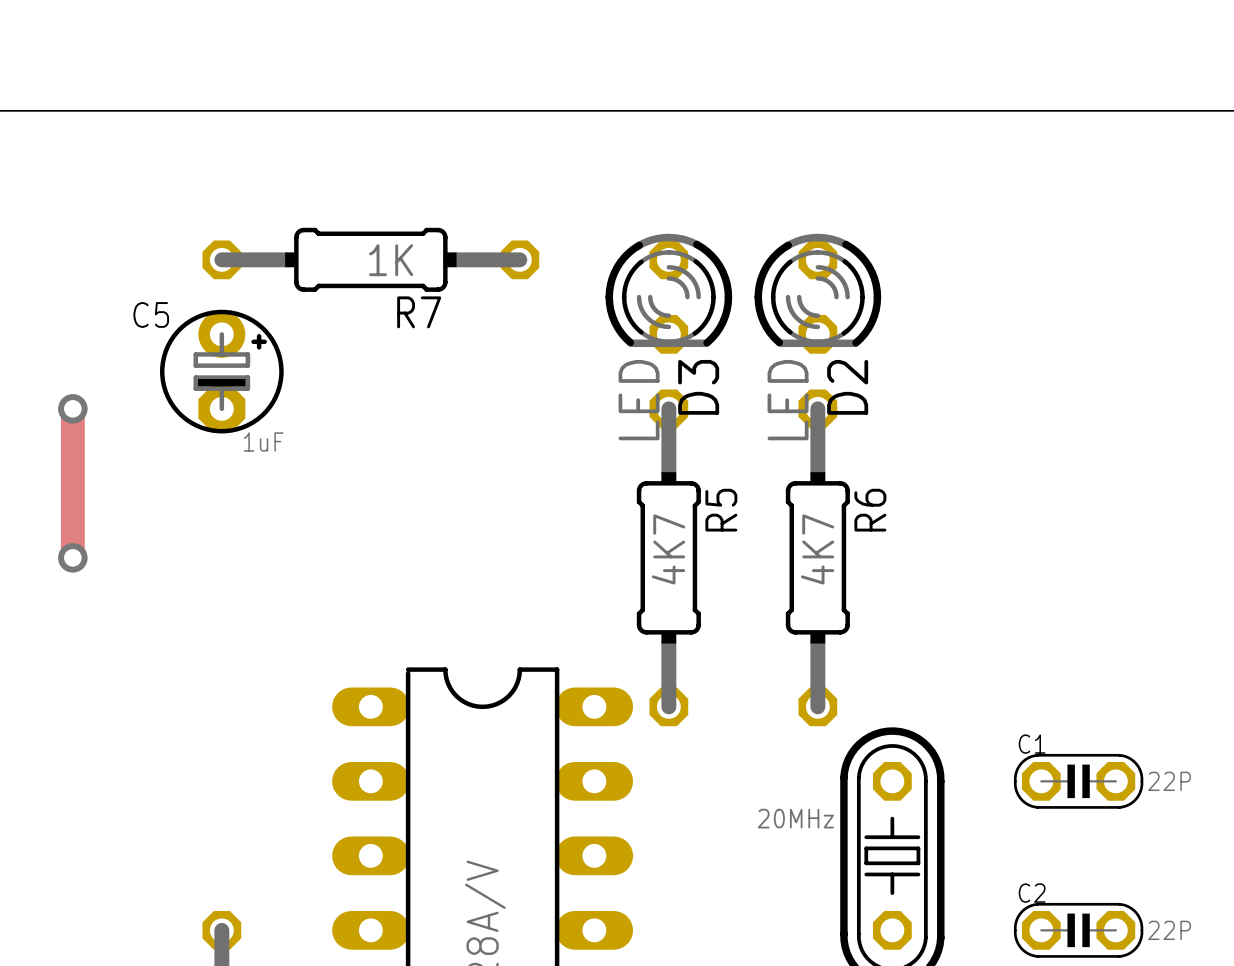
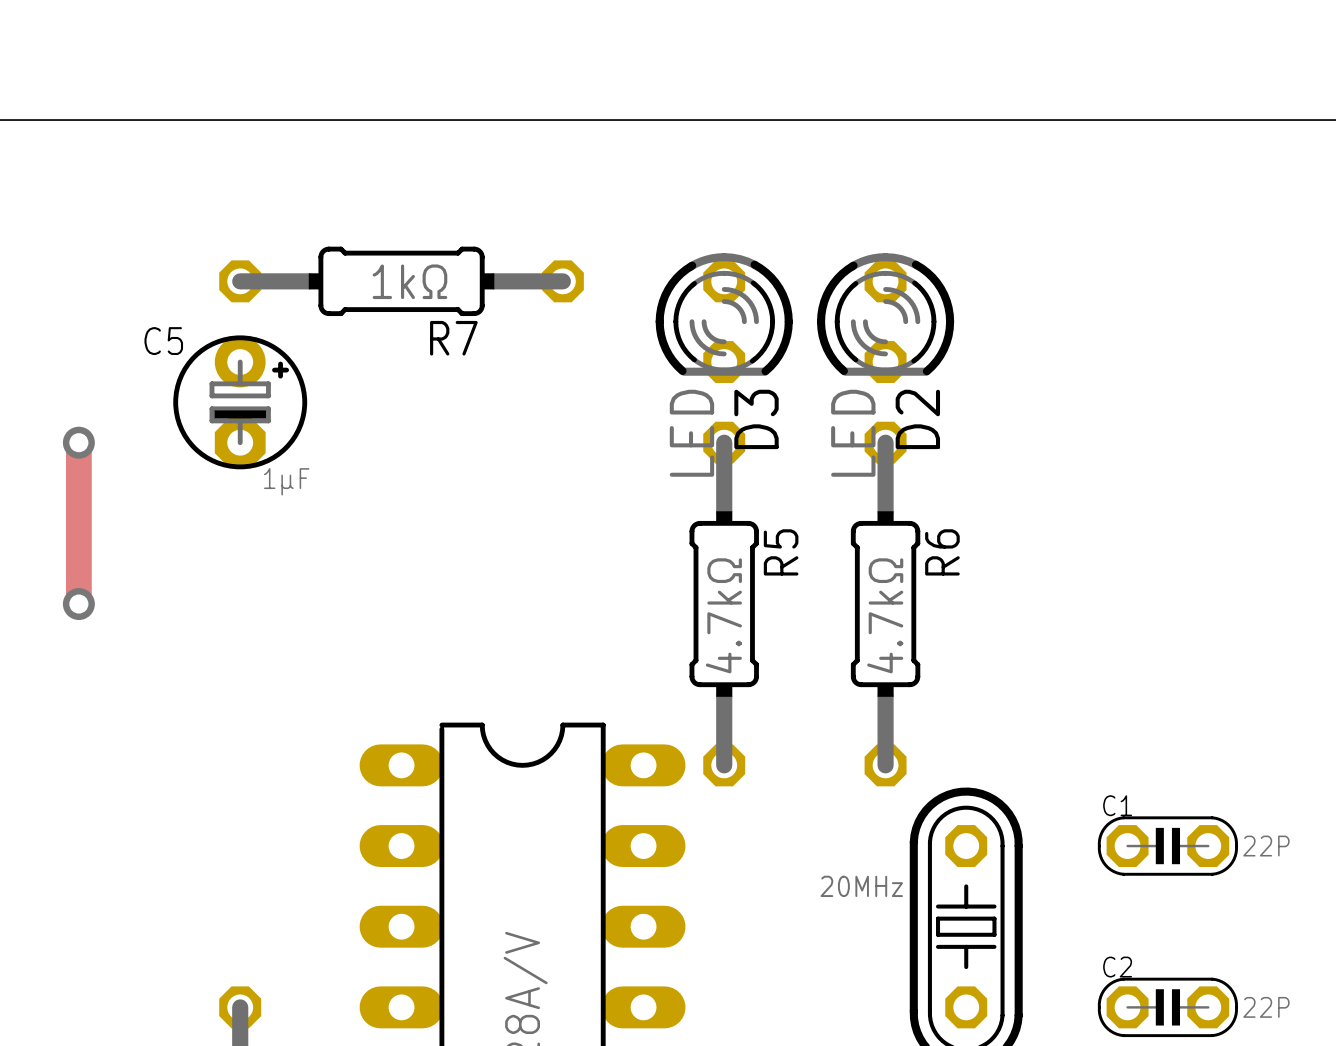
R7 value: 1K (391, 260) -> 1kΩ (409, 281)
C5 value: 1uF (263, 442) -> 1μF (286, 481)
R5 value: 4K7 (668, 549) -> 4.7kΩ (723, 615)
R6 value: 4K7 (817, 549) -> 4.7kΩ (885, 615)

